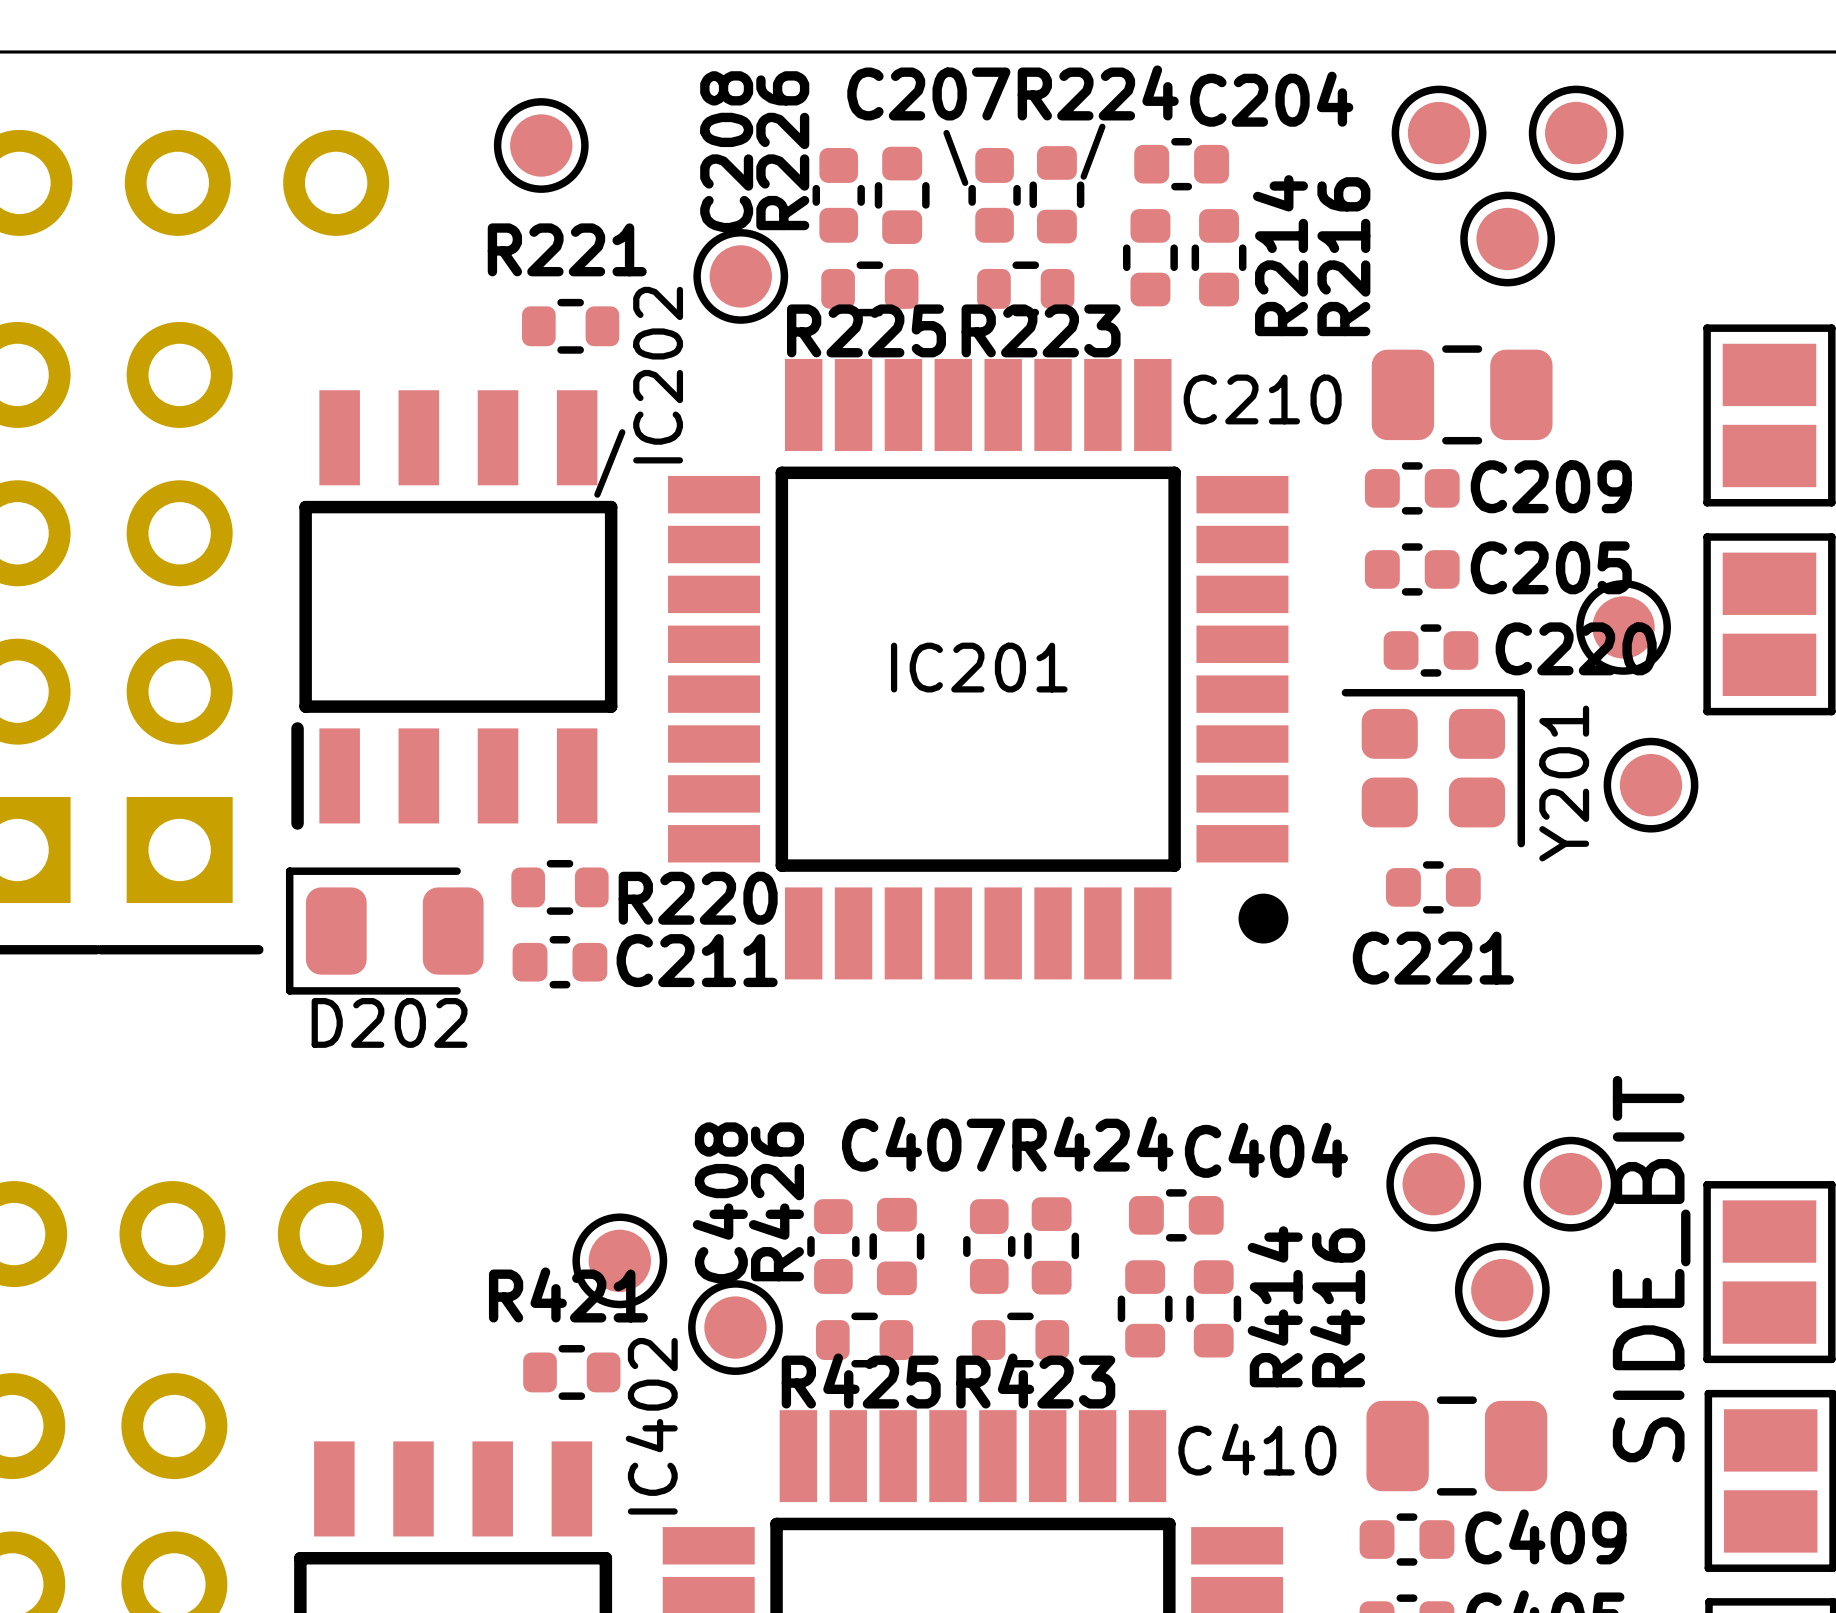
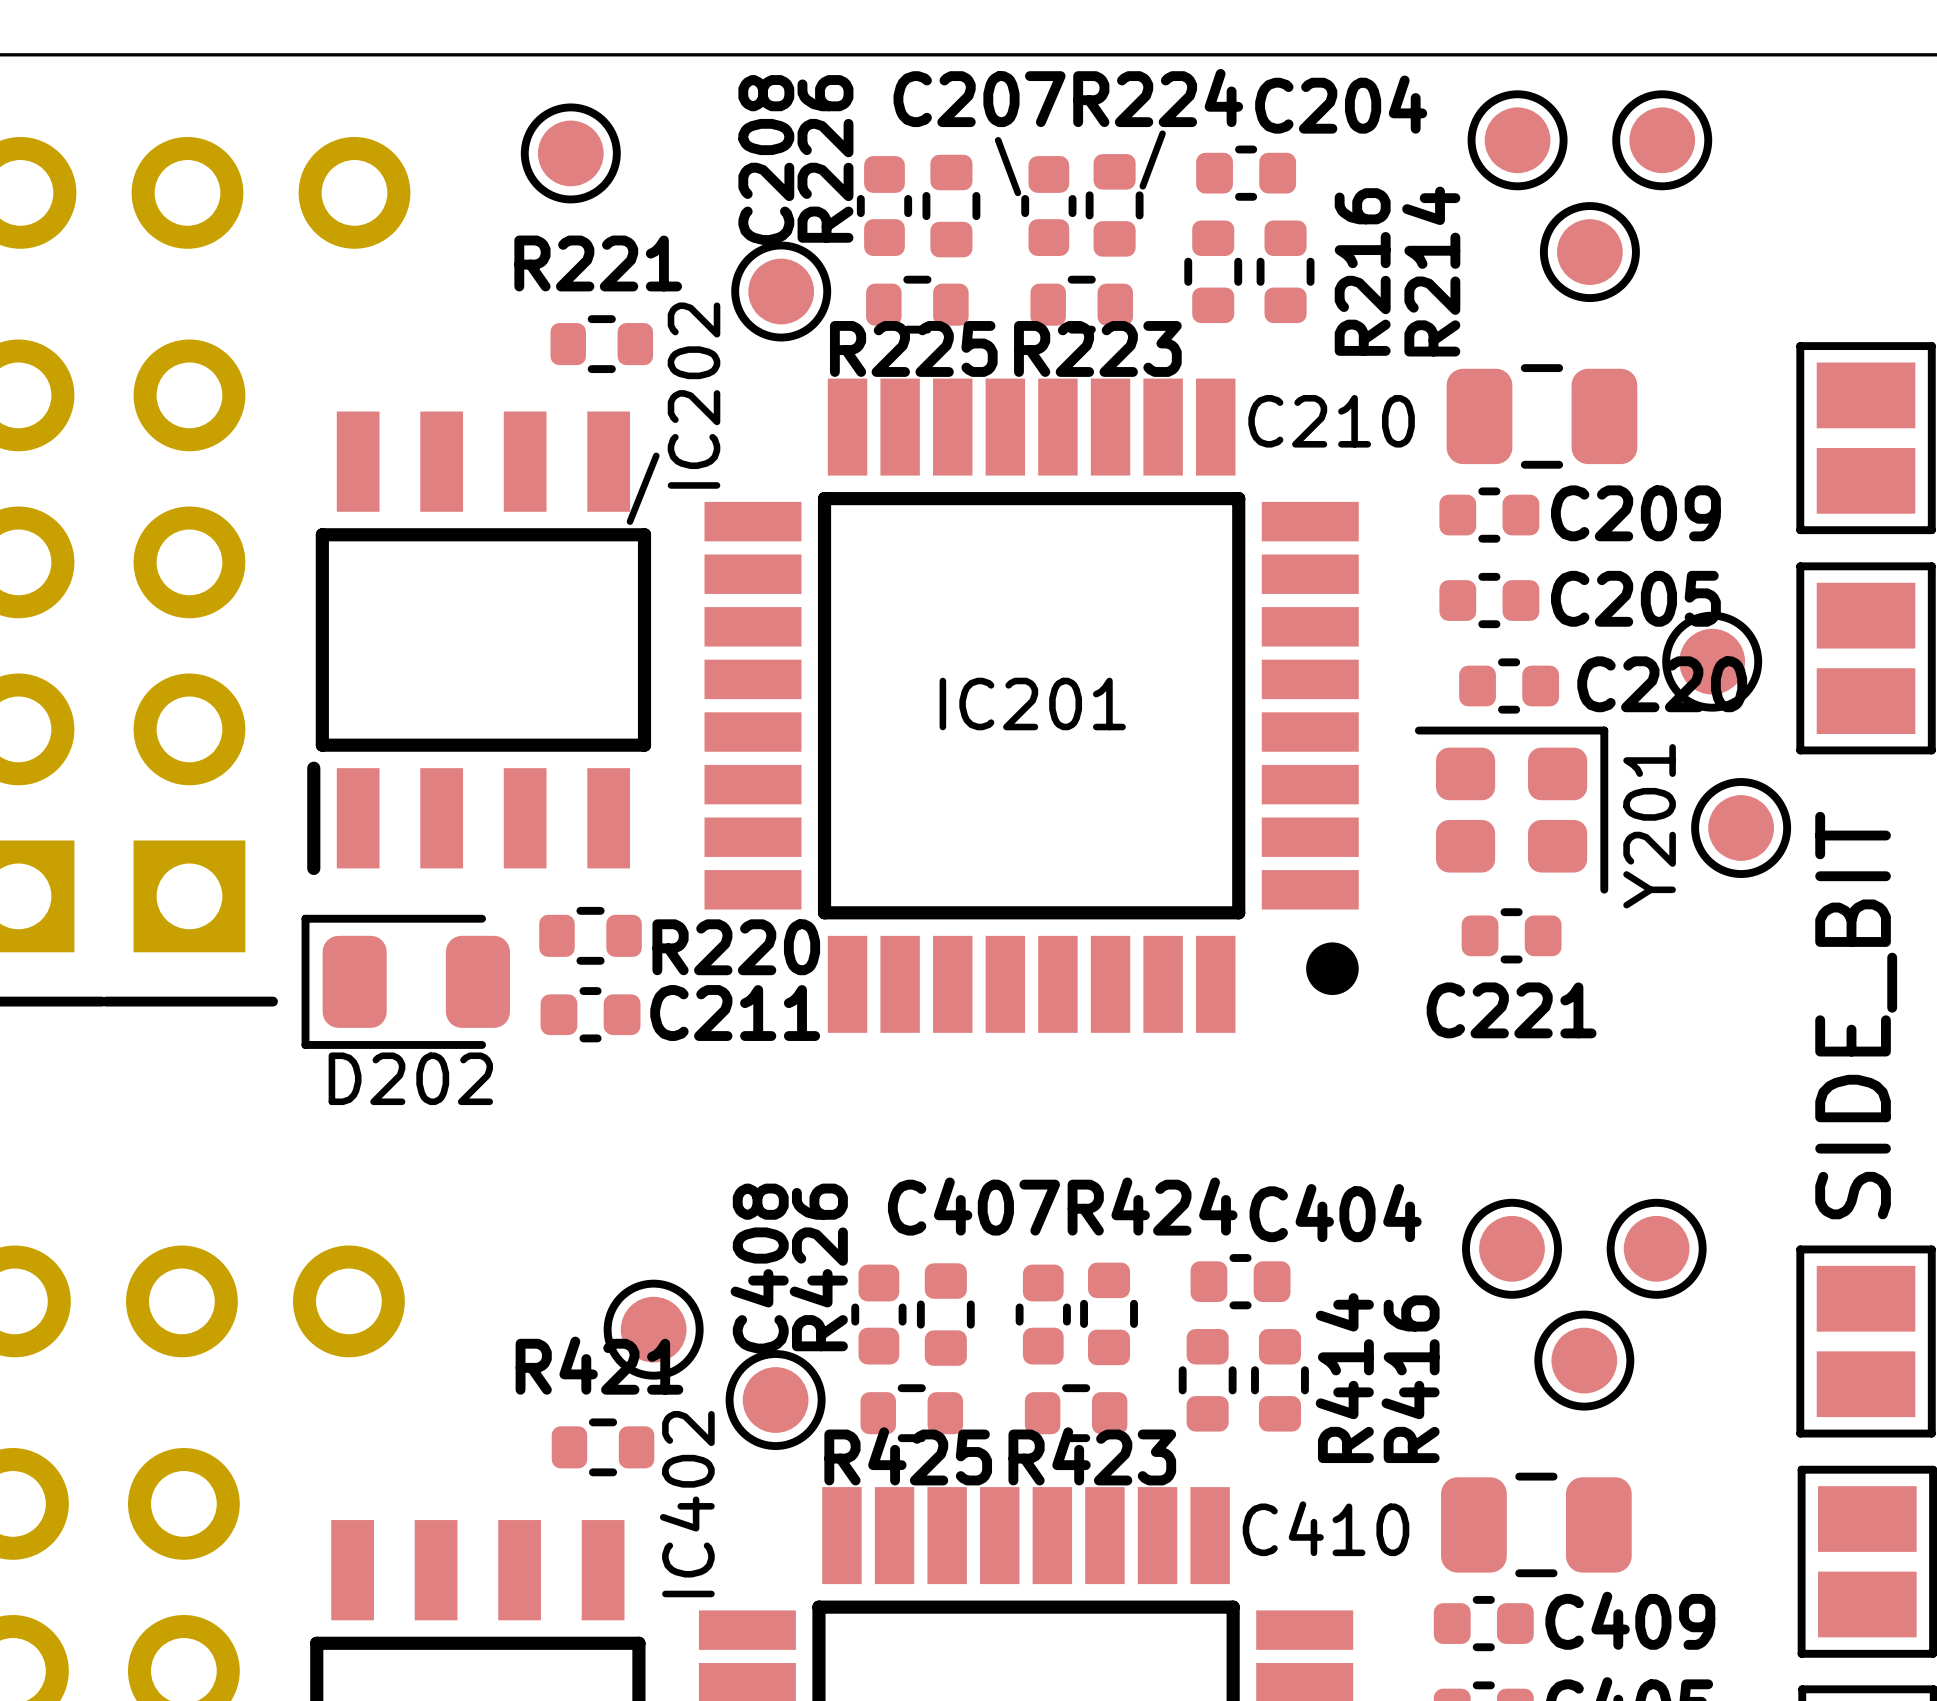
R214 name position: R214 (1280, 255) -> R214 (1431, 271)
R216 name position: R216 (1343, 256) -> R216 (1362, 272)
part value position: SIDE_BIT (1651, 1269) -> SIDE_BIT (1856, 1015)

